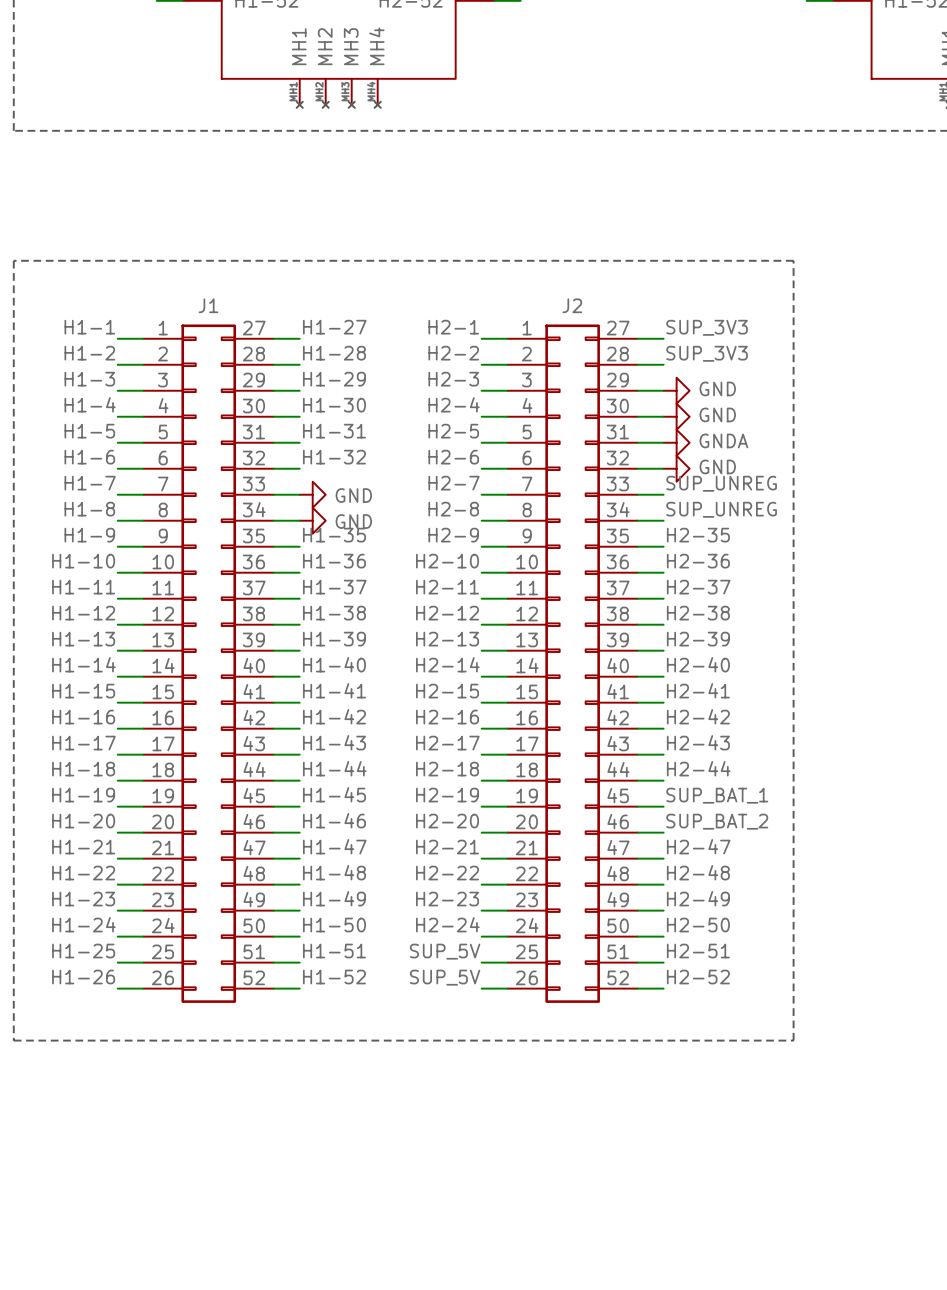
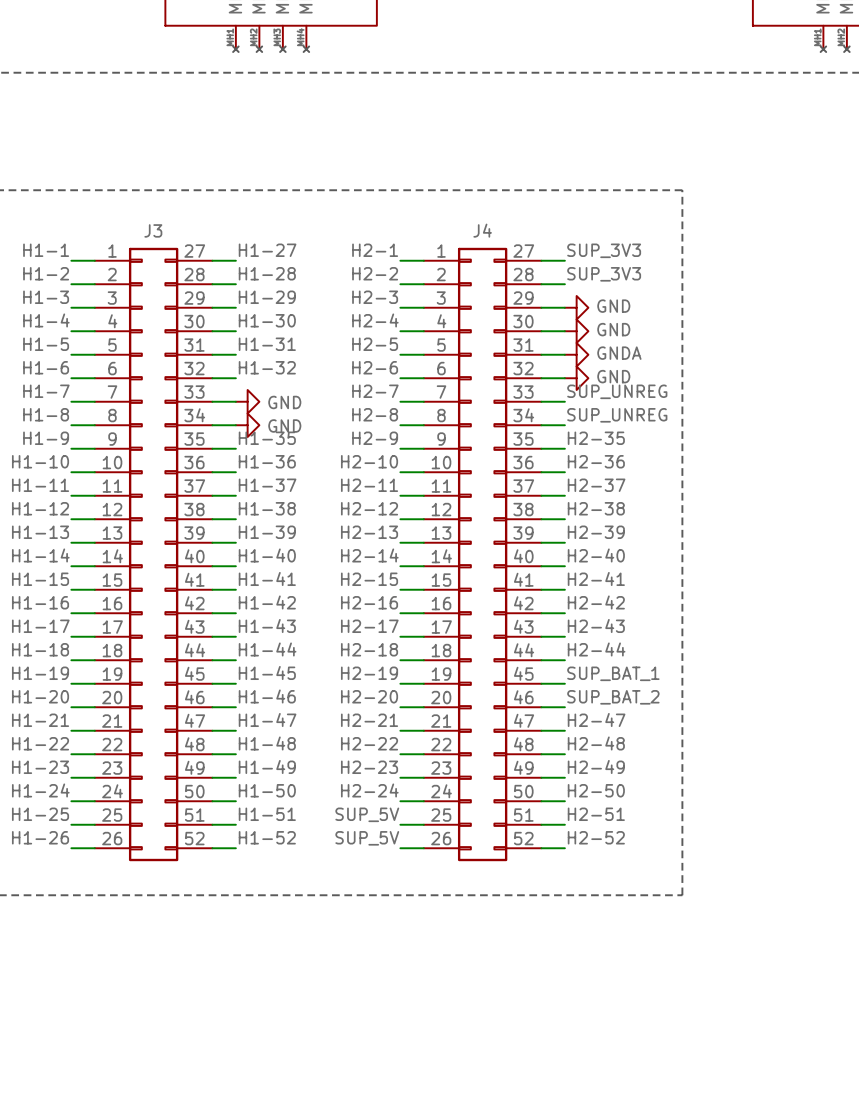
J1 name: J1 (208, 305) -> J3 (153, 230)
J2 name: J2 (572, 305) -> J4 (482, 230)

